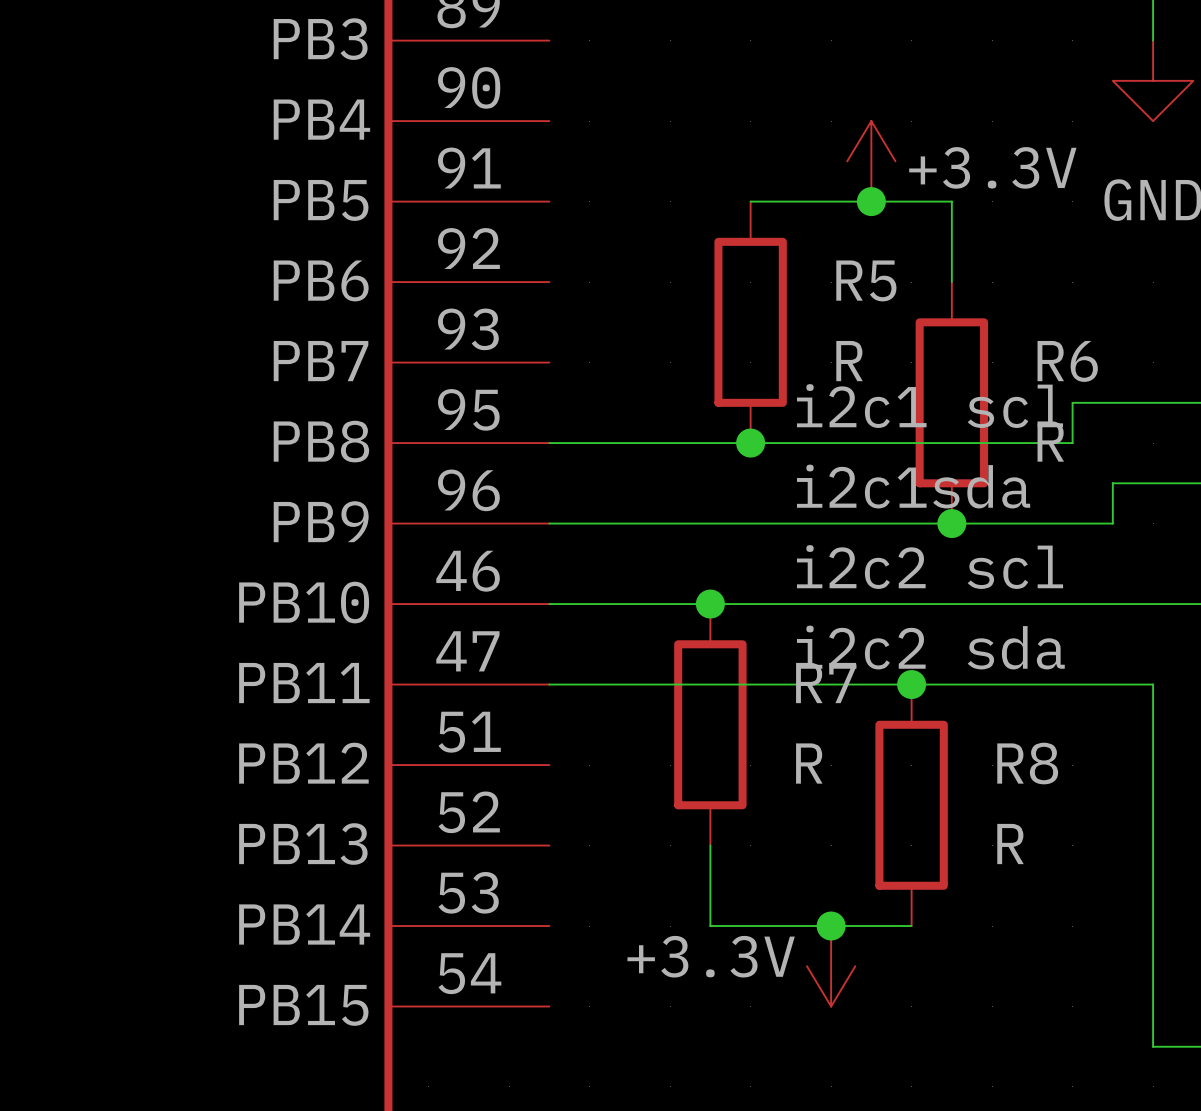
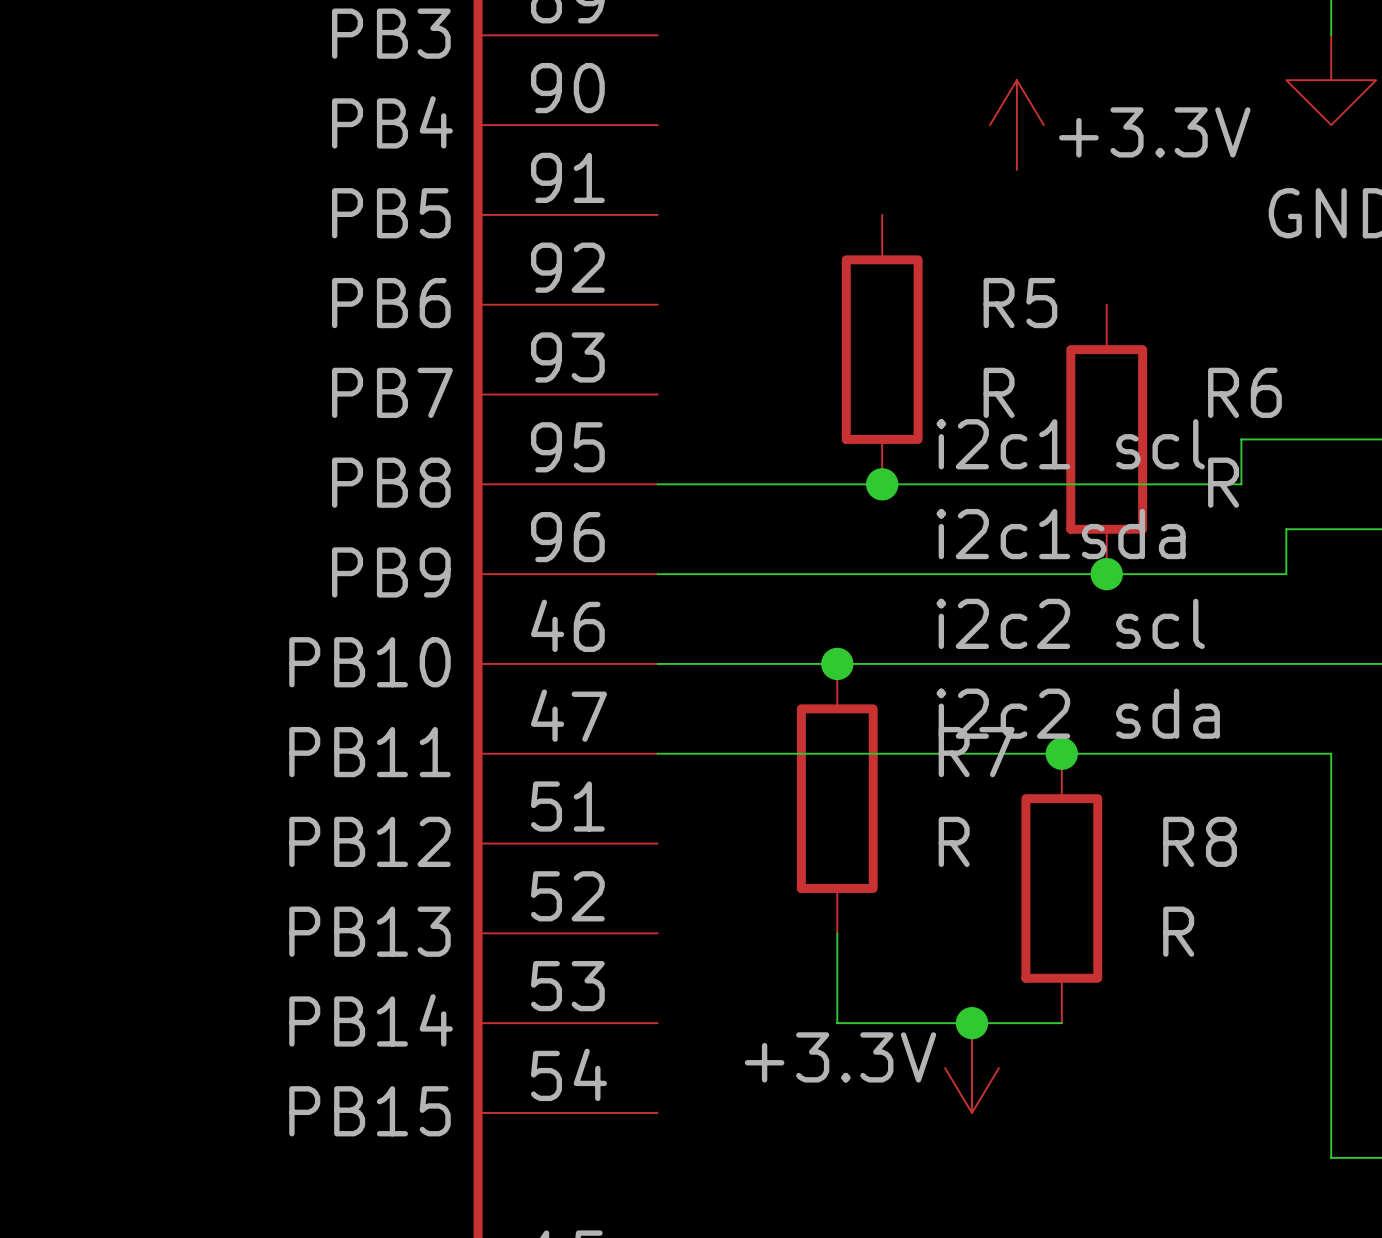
power symbol position: +3.3V (871, 161) -> +3.3V (1016, 125)
wire: (750, 201) (951, 201) (951, 282) -> none
junction: (871, 201) -> none

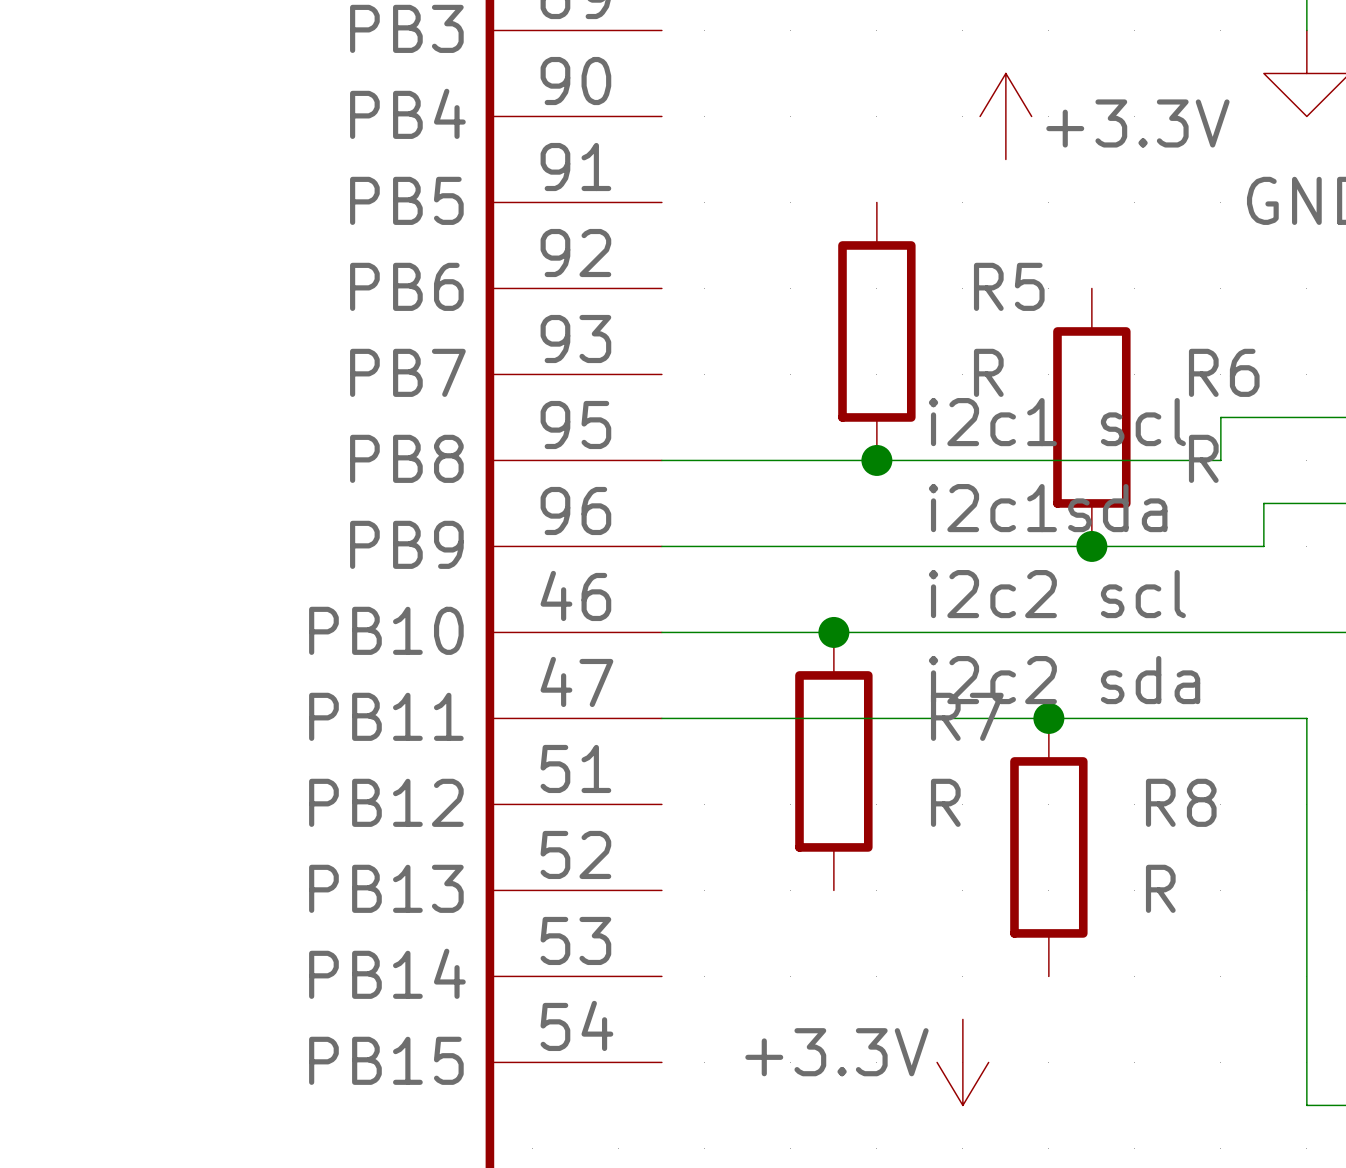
wire: (837, 933) (837, 1023) (1061, 1023) -> none
junction: (972, 1023) -> none
power symbol position: +3.3V (972, 1068) -> +3.3V (962, 1062)

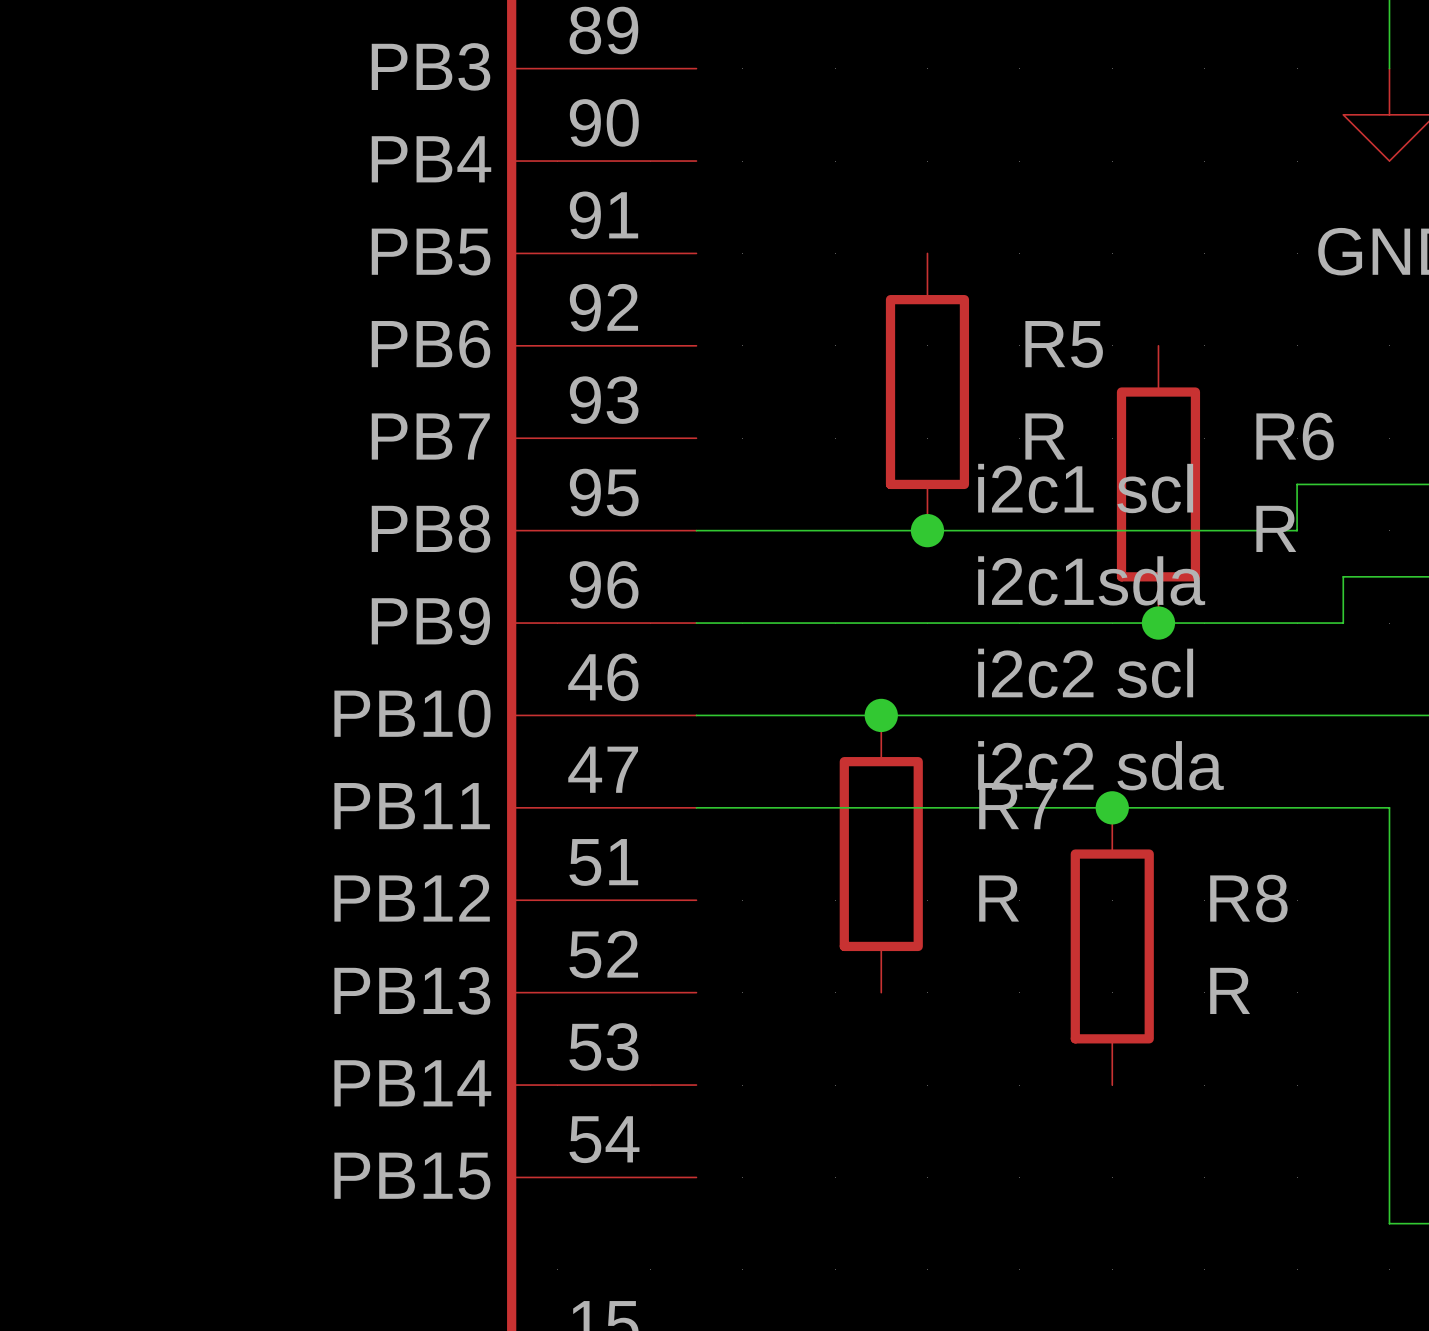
power symbol: +3.3V (1005, 116) -> none
power symbol: +3.3V (962, 1062) -> none

